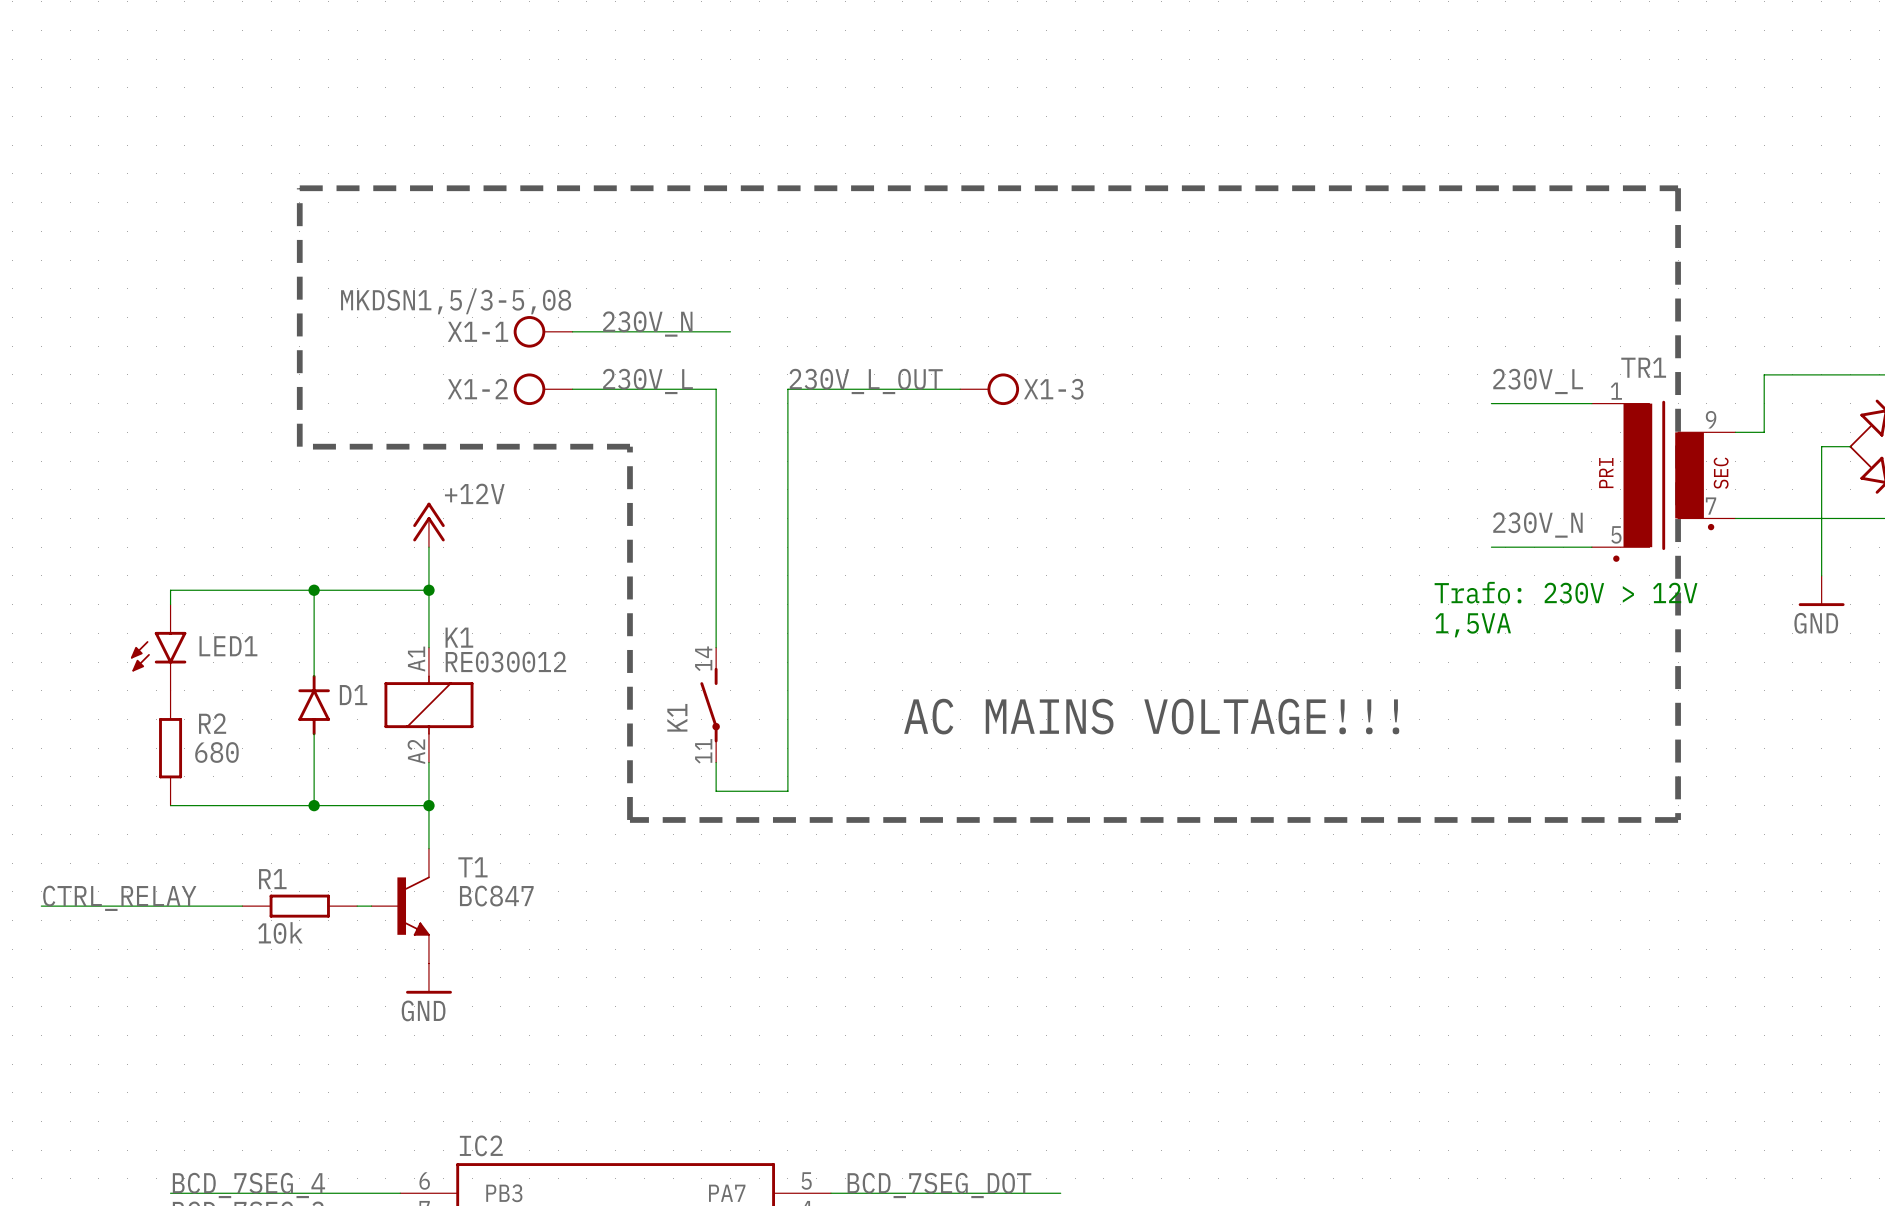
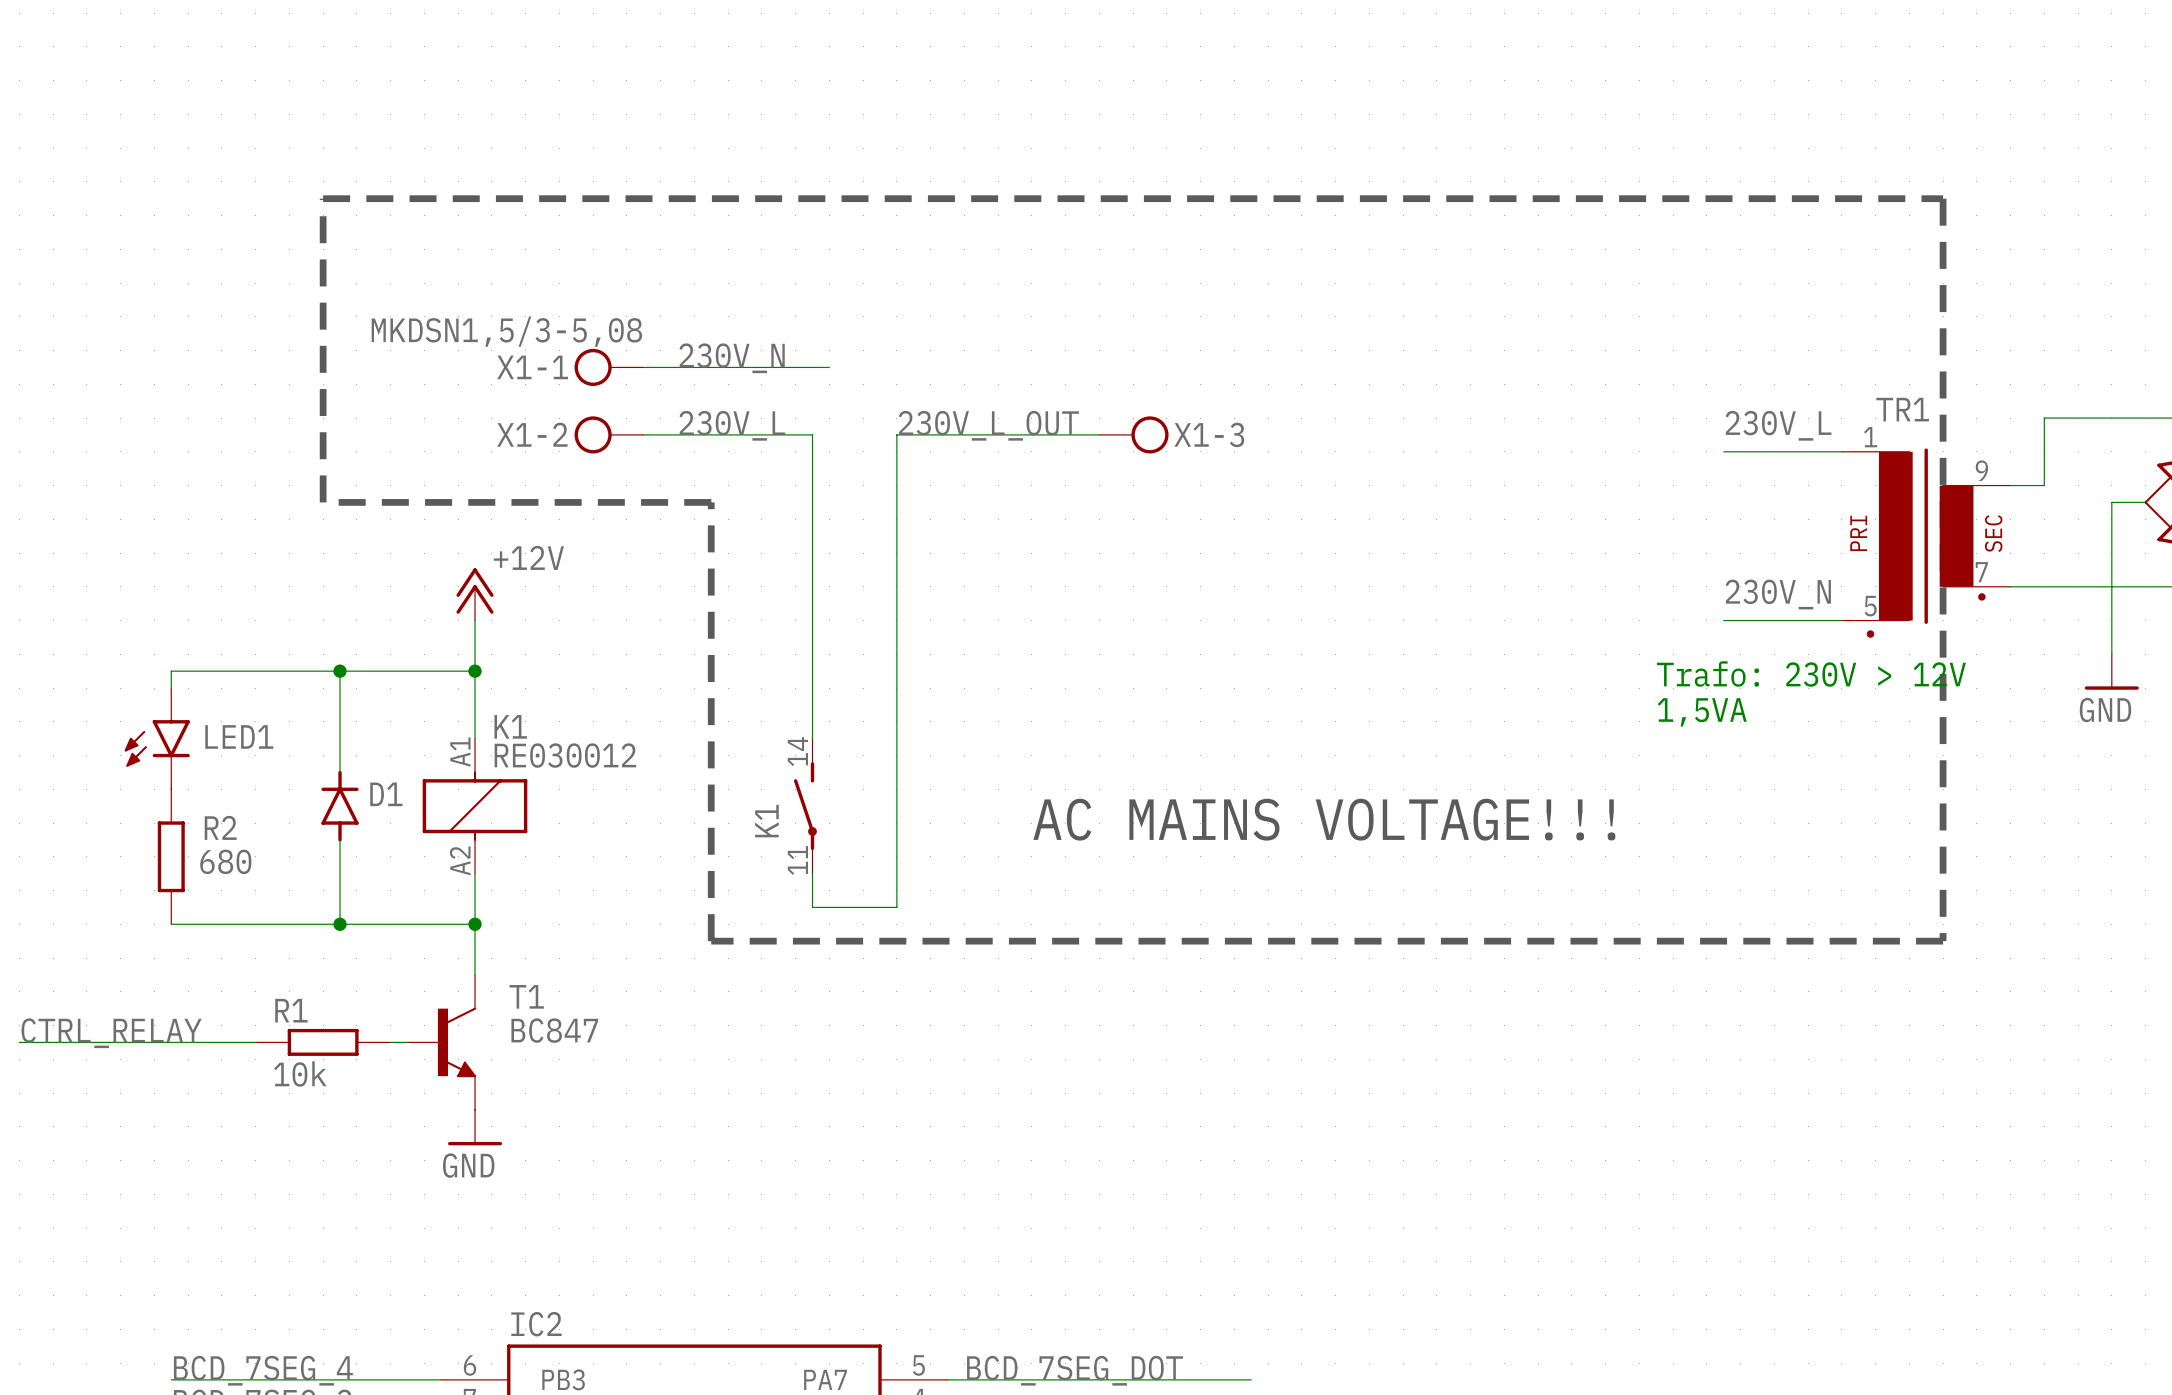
wire: none -> (1217, 1379) (1251, 1379)

